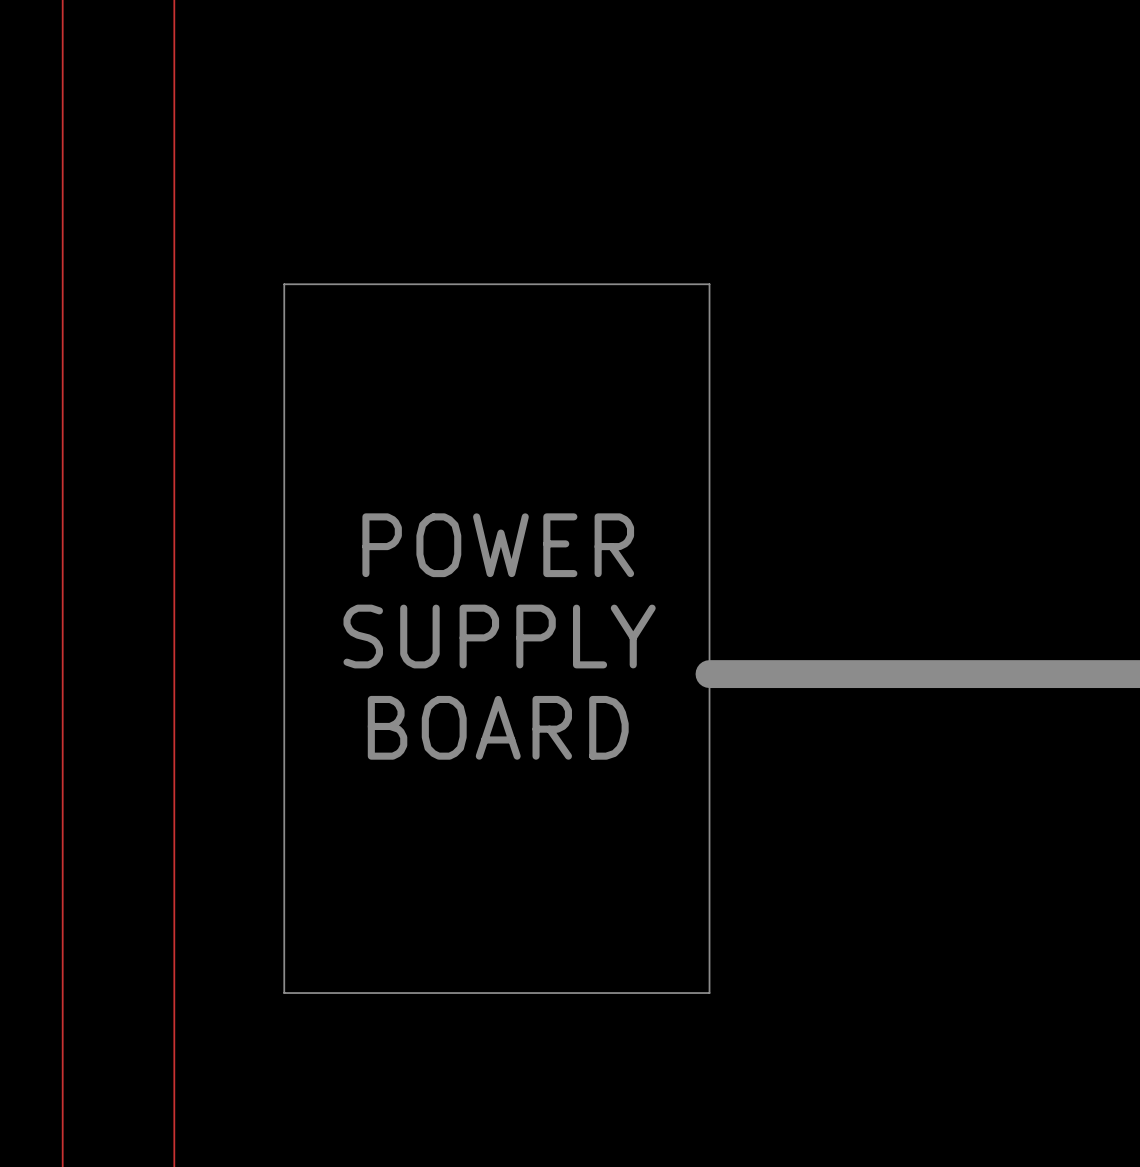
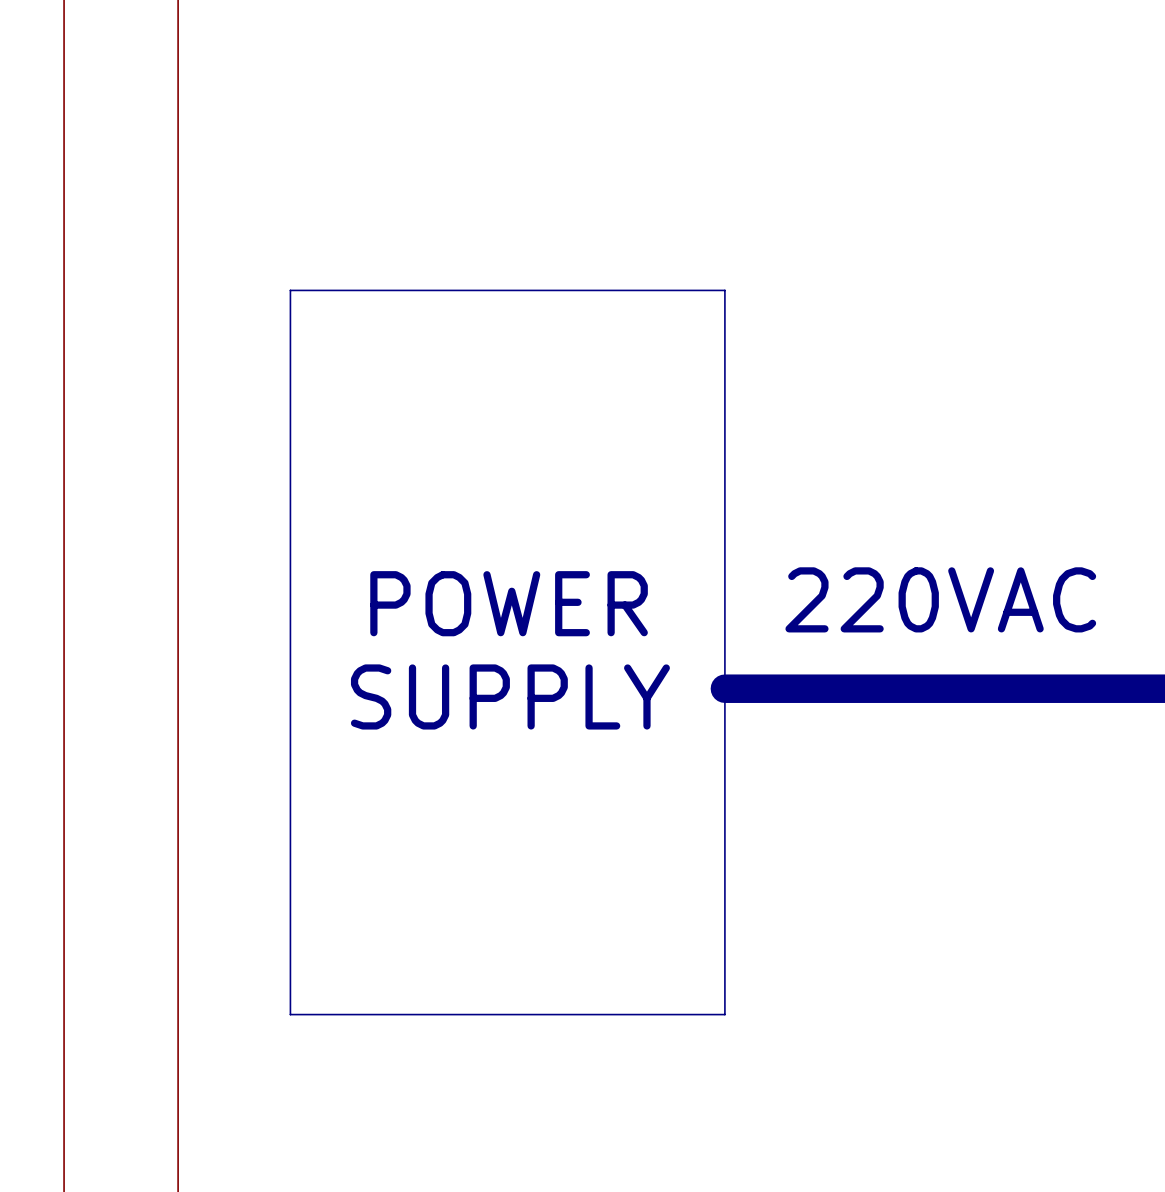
text position: POWER (498, 545) -> POWER (509, 603)
text: none -> 220VAC (940, 599)
text position: SUPPLY (499, 636) -> SUPPLY (510, 696)
text: BOARD (498, 727) -> none

